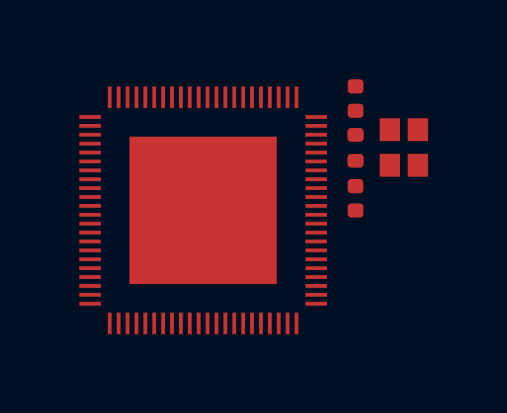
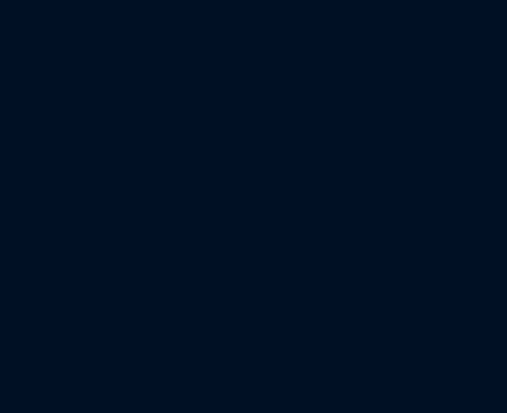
part: (355, 98) -> none
part: (355, 147) -> none
part: (403, 147) -> none
part: (355, 198) -> none
part: (203, 210) -> none

